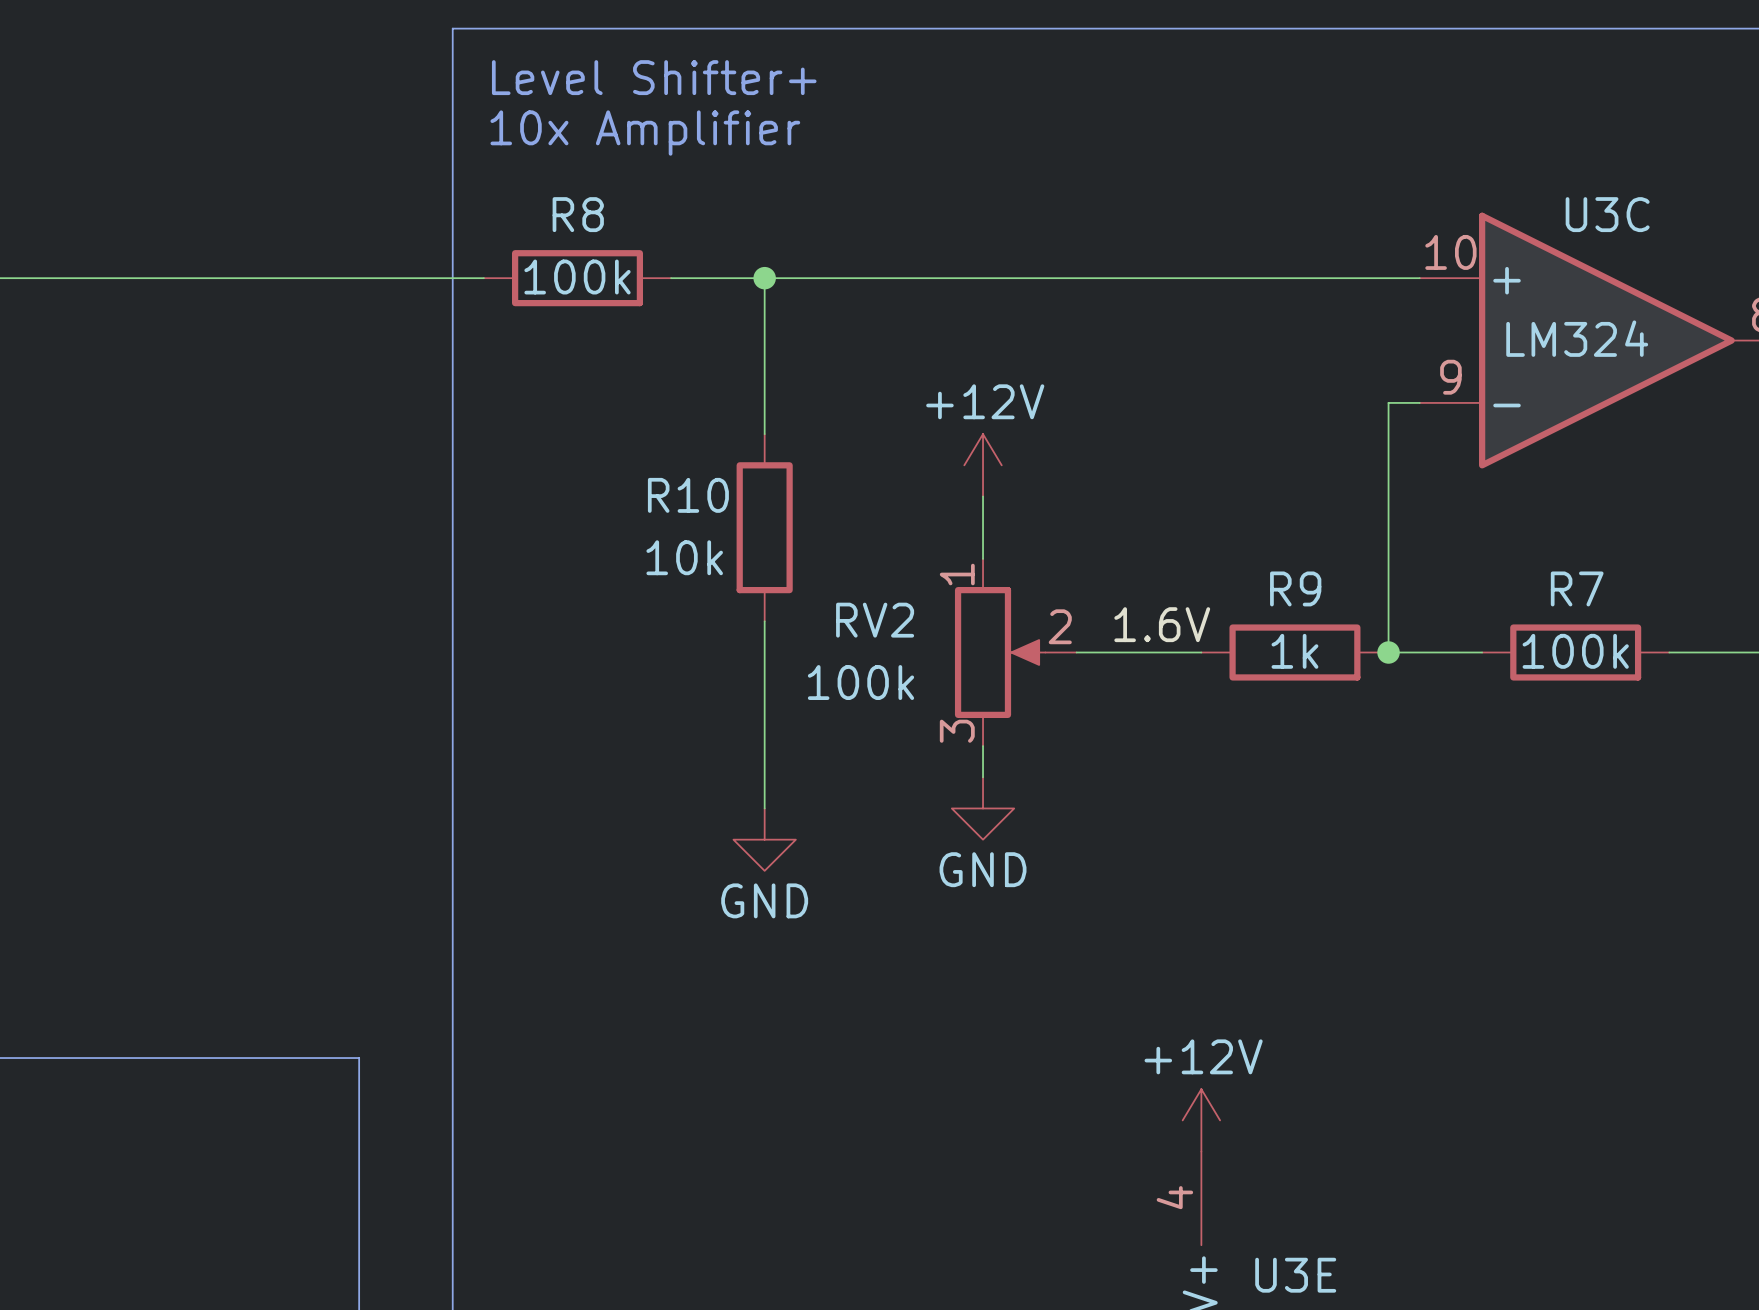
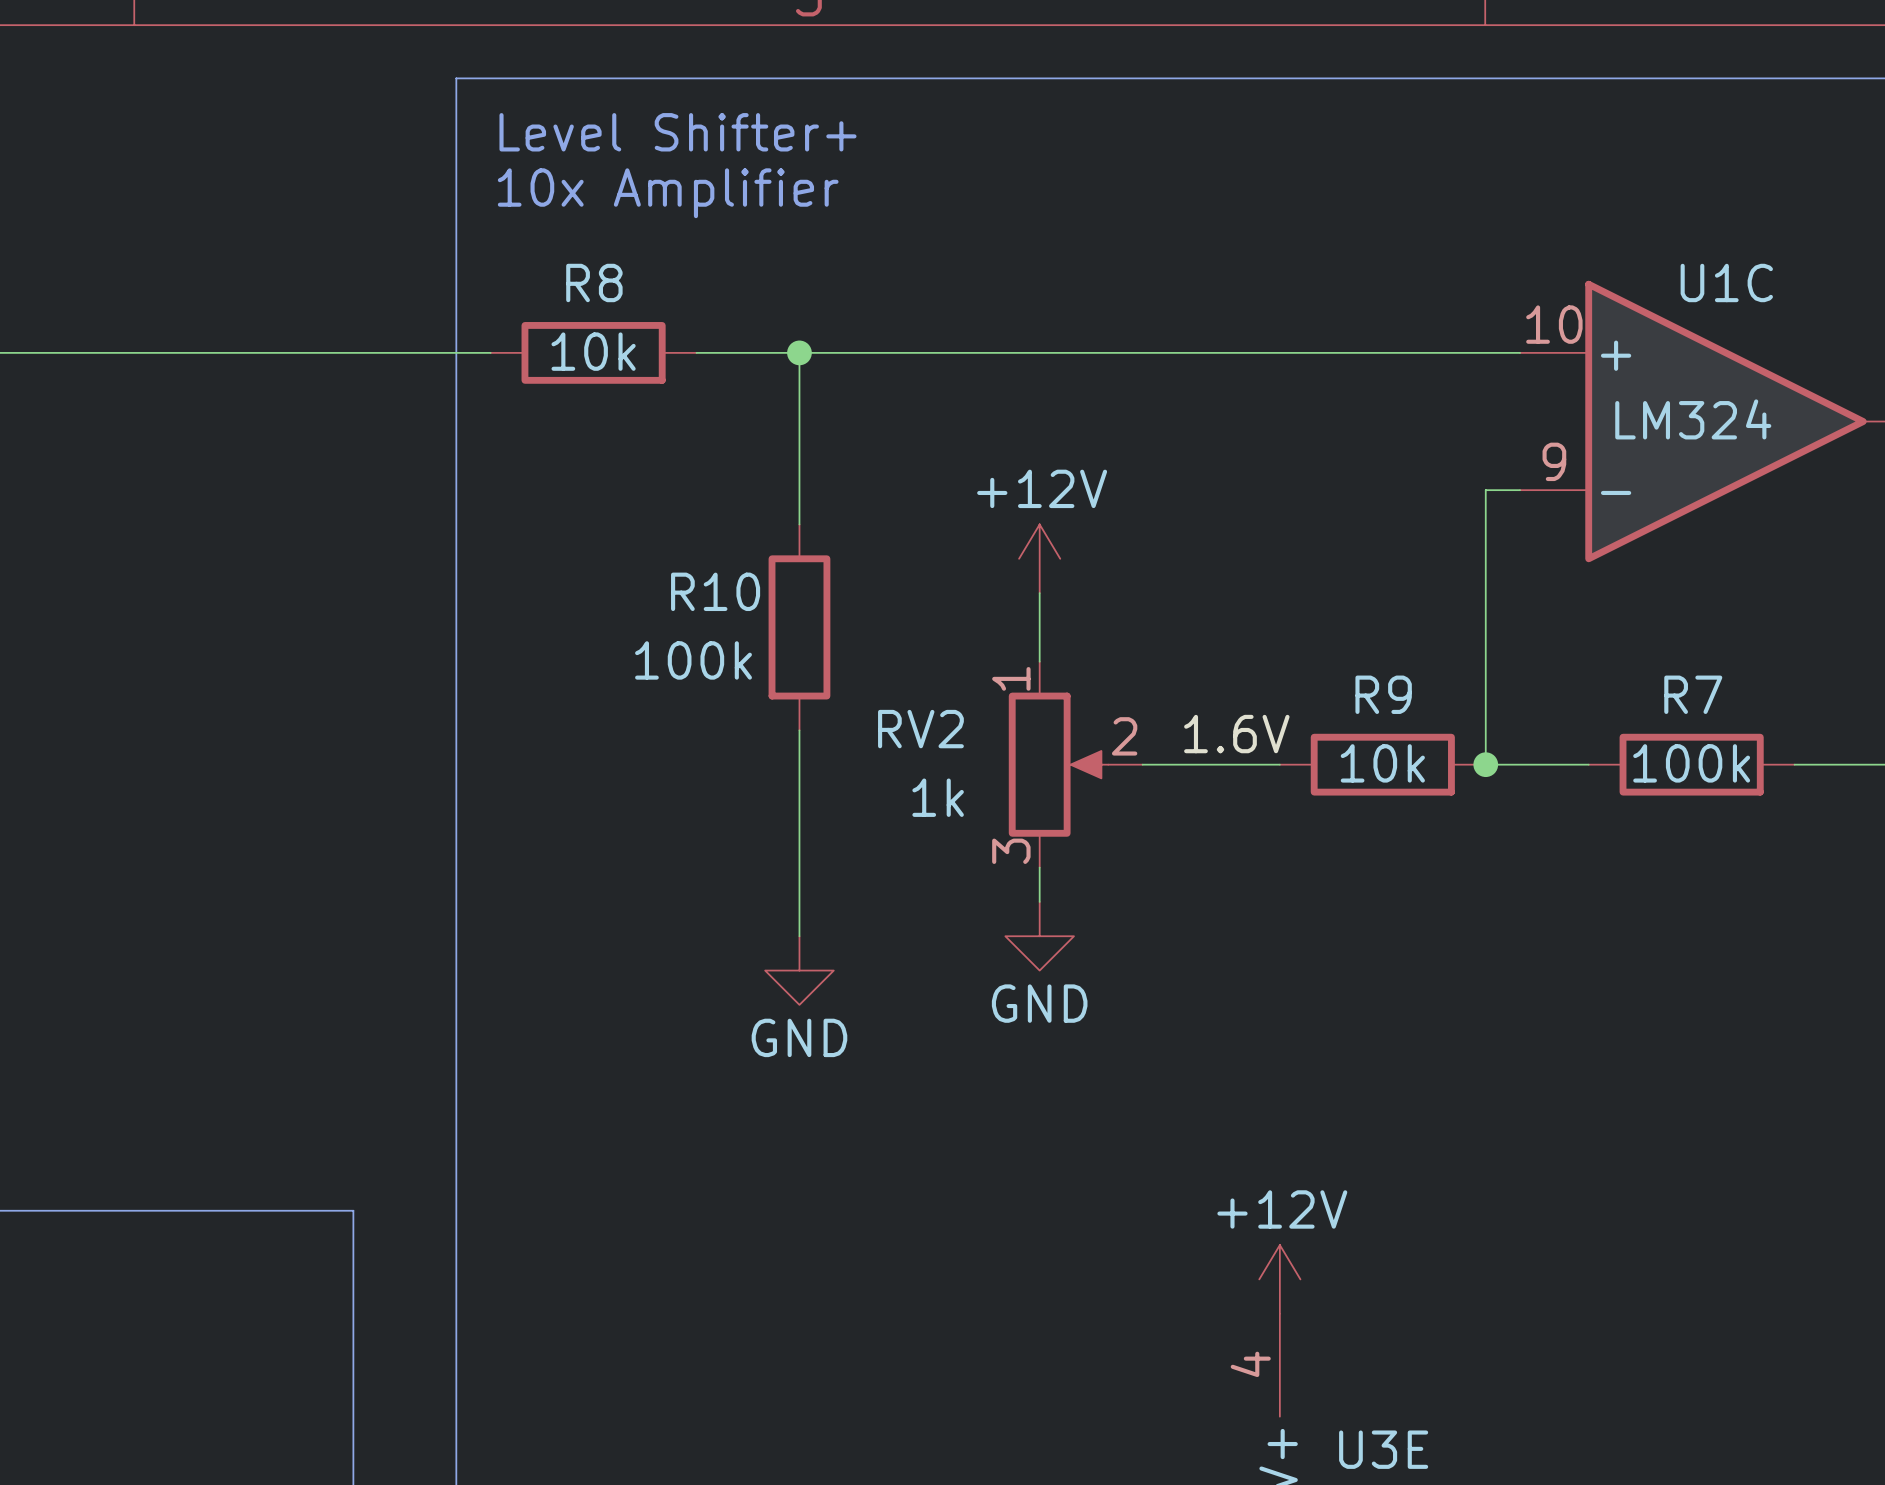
U3C name: U3C (1607, 214) -> U1C (1726, 282)
R8 value: 100k (577, 277) -> 10k (593, 351)
R10 value: 10k (684, 557) -> 100k (693, 660)
R9 value: 1k (1294, 651) -> 10k (1382, 763)
RV2 value: 100k (860, 682) -> 1k (938, 797)

